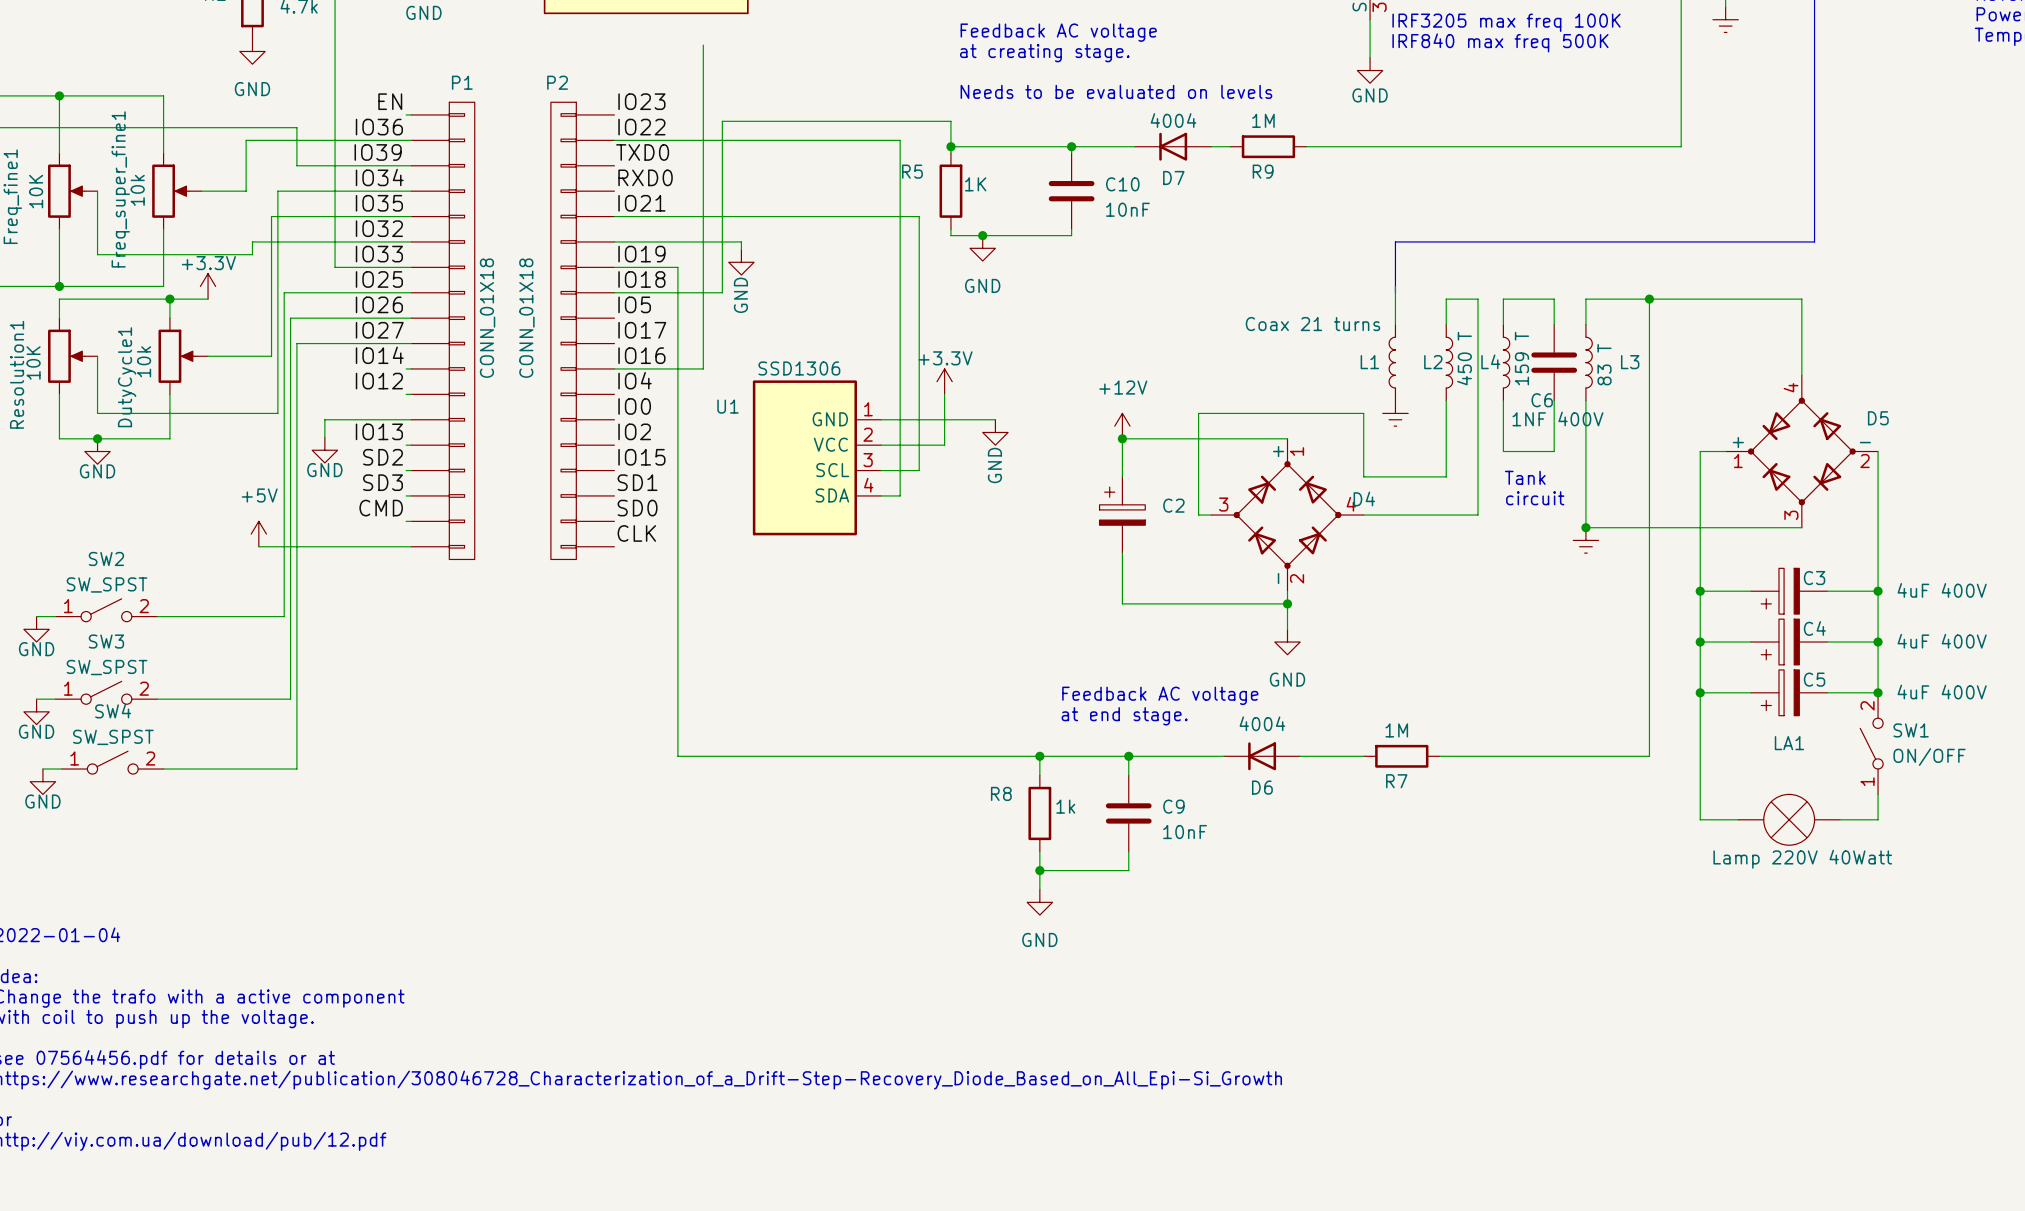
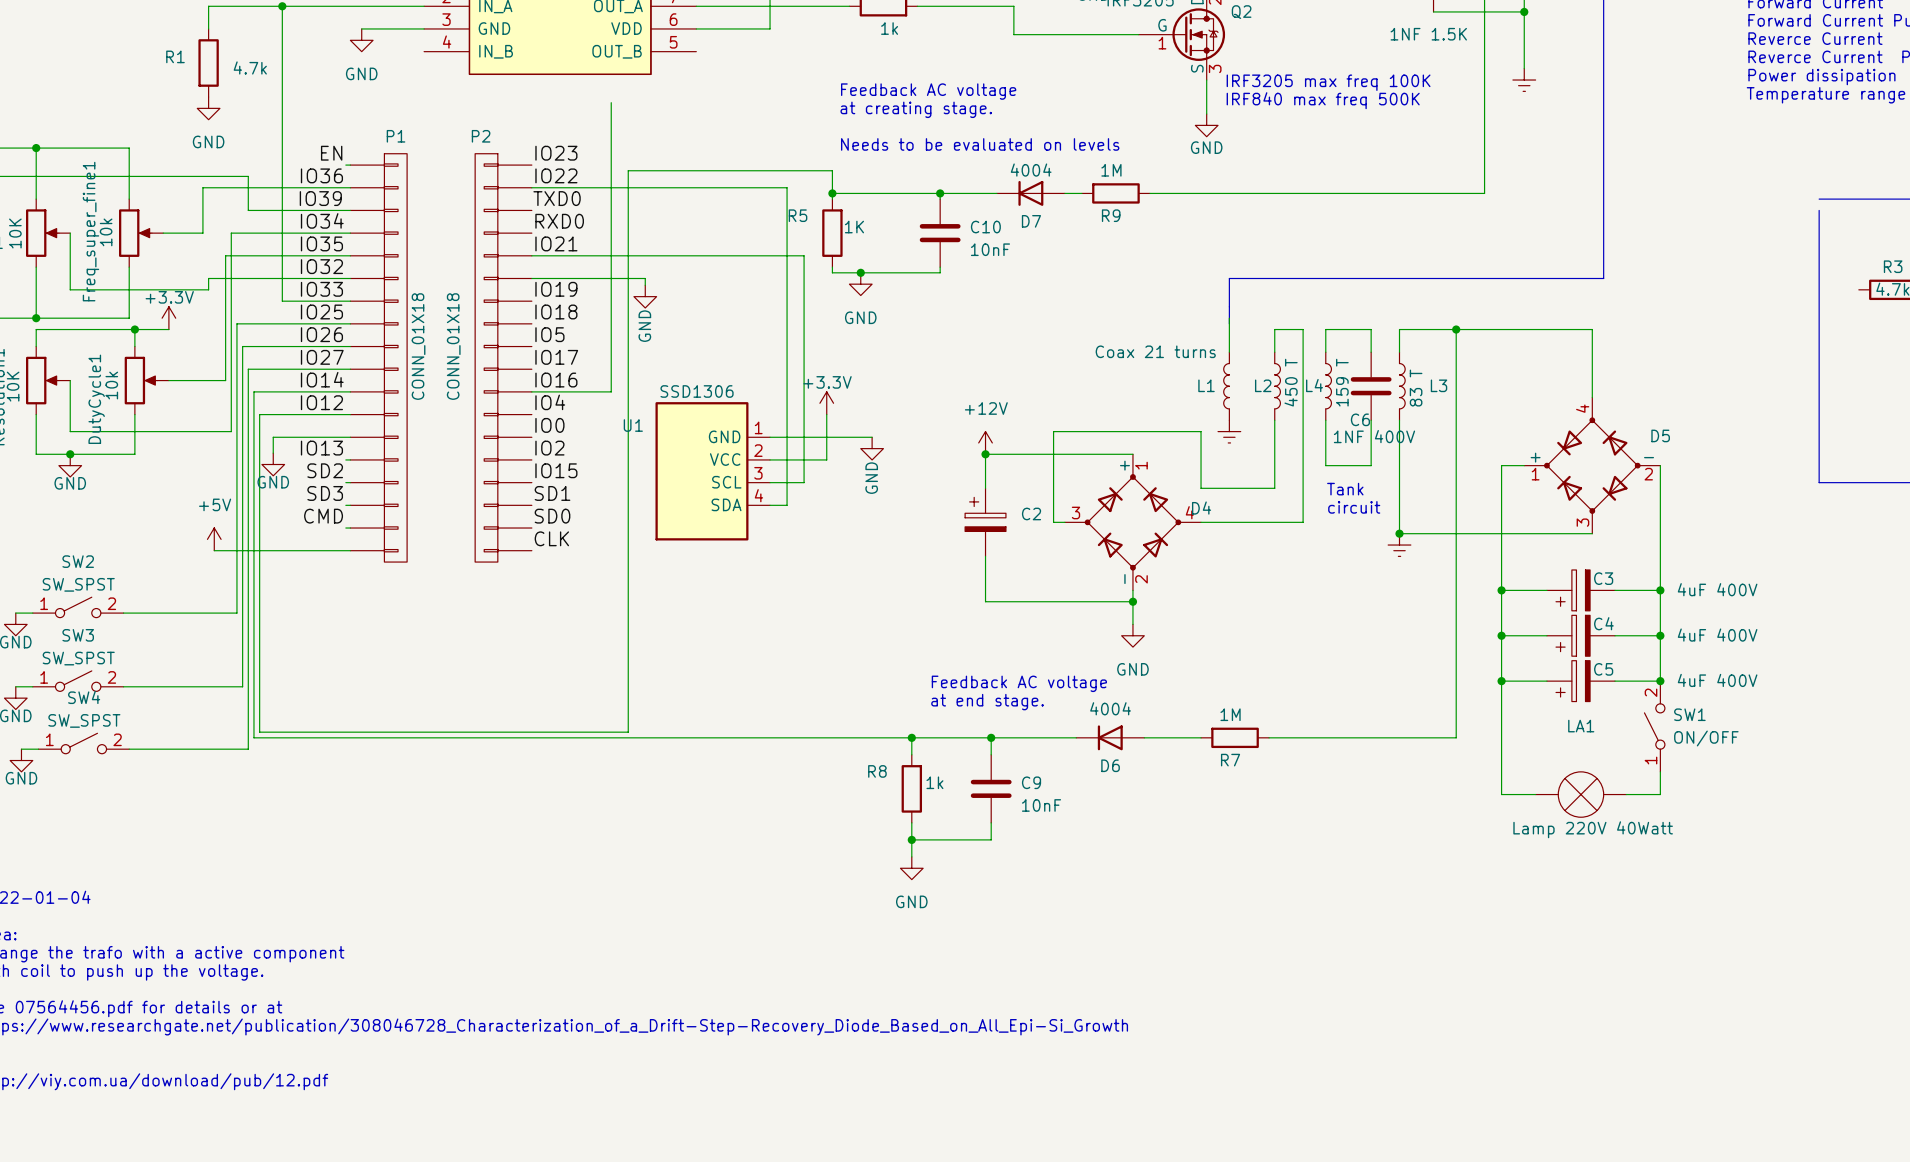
wire: (614, 267) (677, 267) (677, 756) -> (345, 391) (253, 391) (253, 737) (588, 737)
wire: (614, 292) (722, 292) -> (345, 414) (259, 414) (259, 732) (628, 732) (628, 323)

